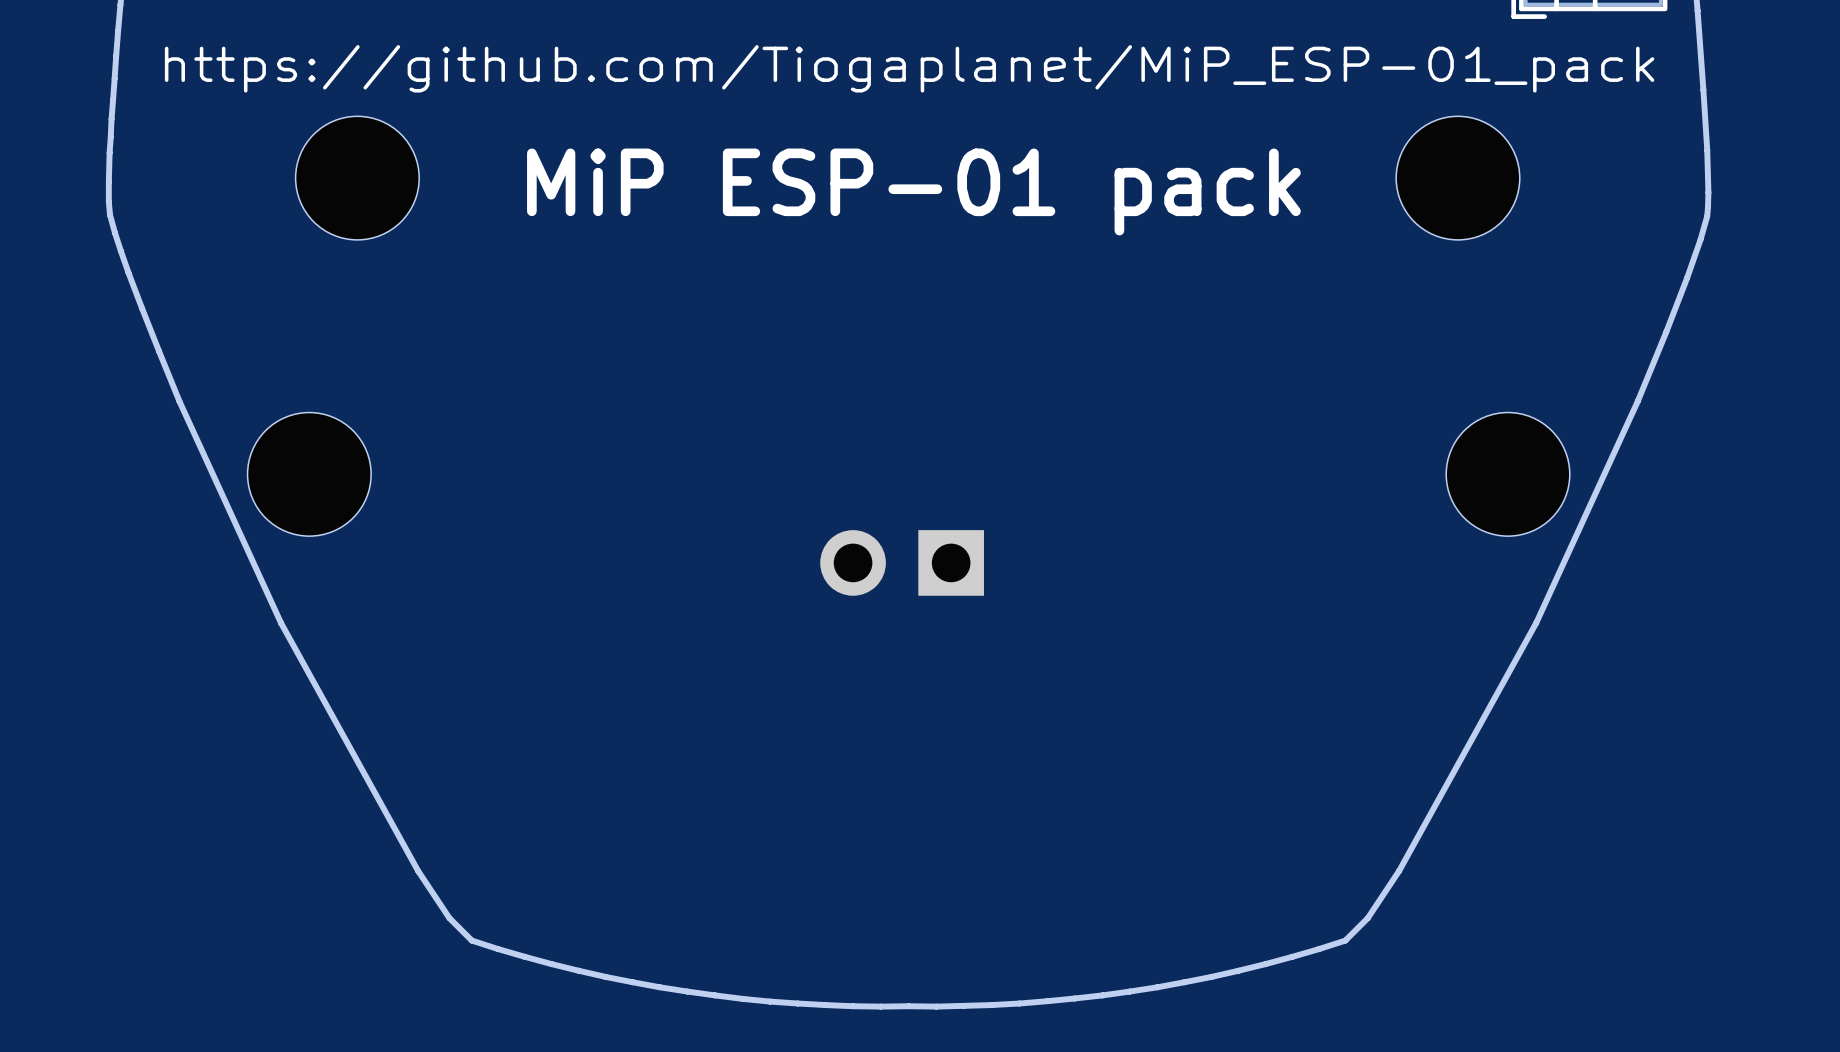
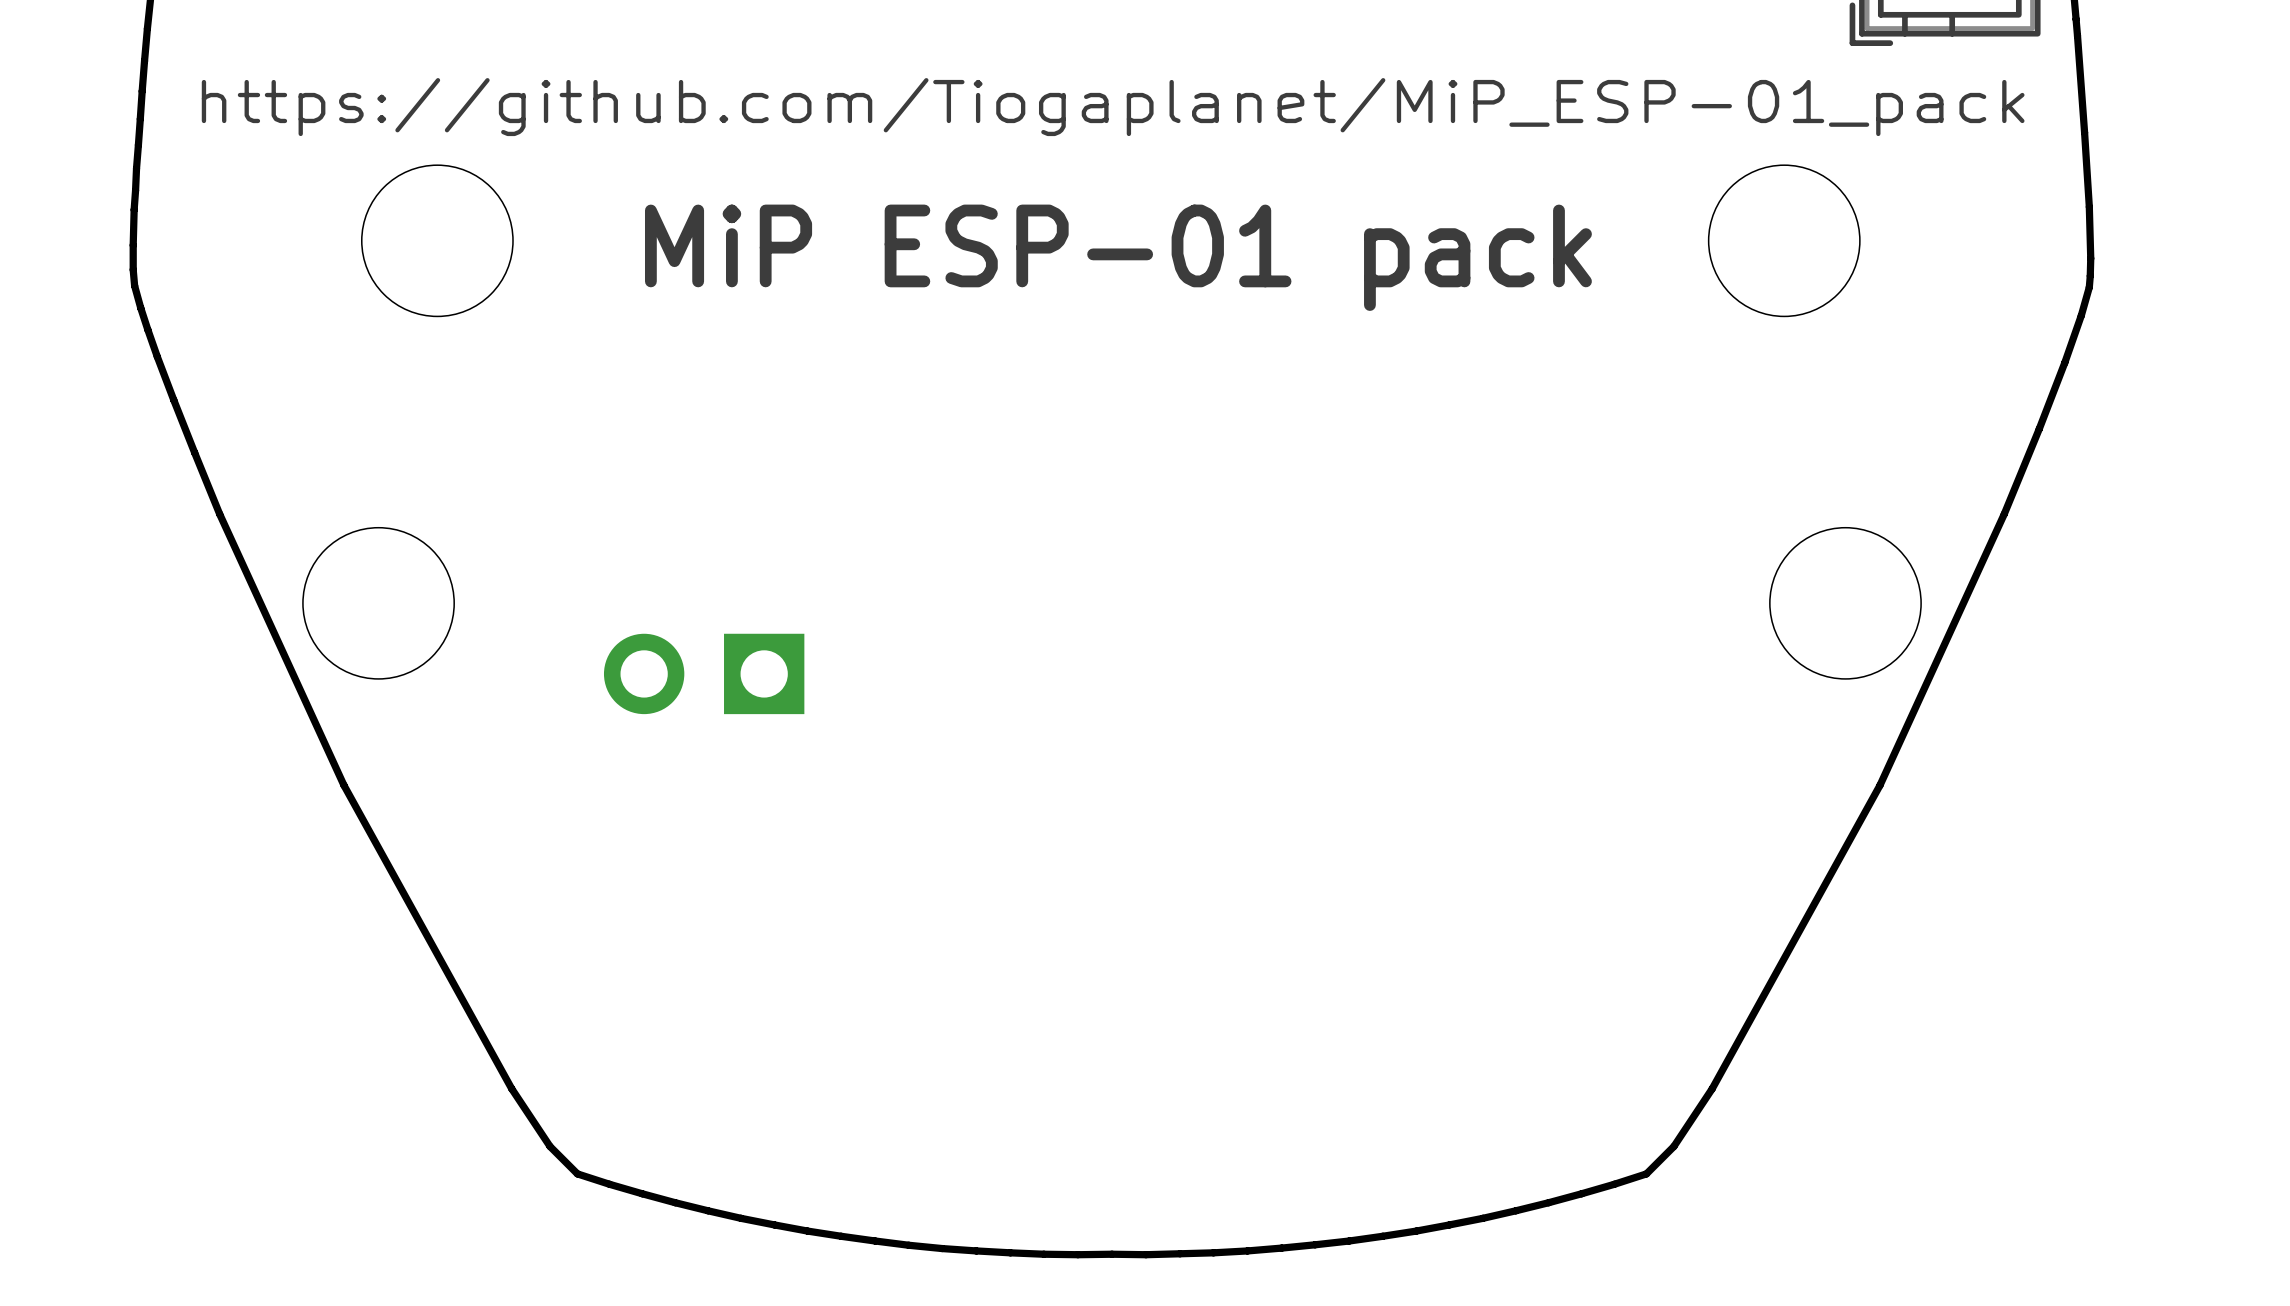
part position: (902, 562) -> (704, 673)

